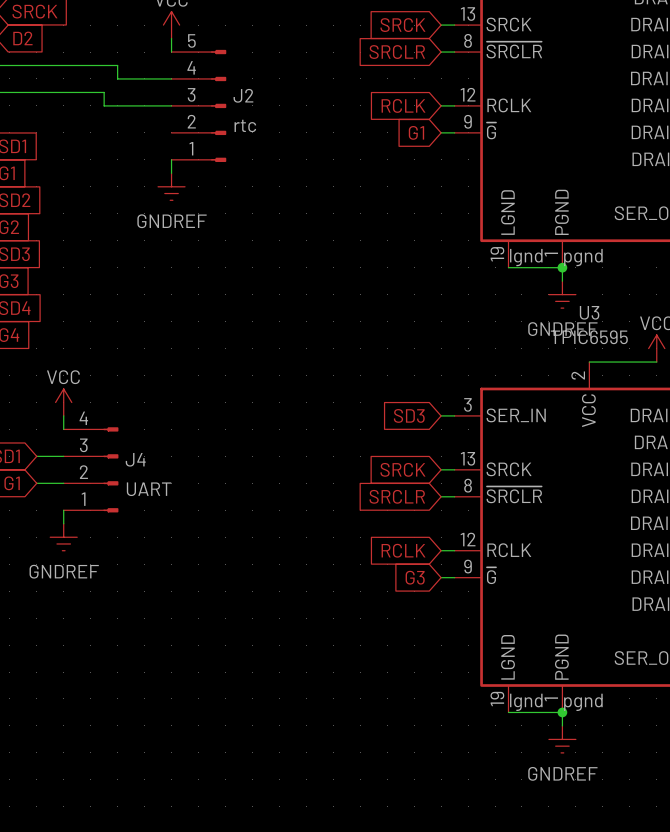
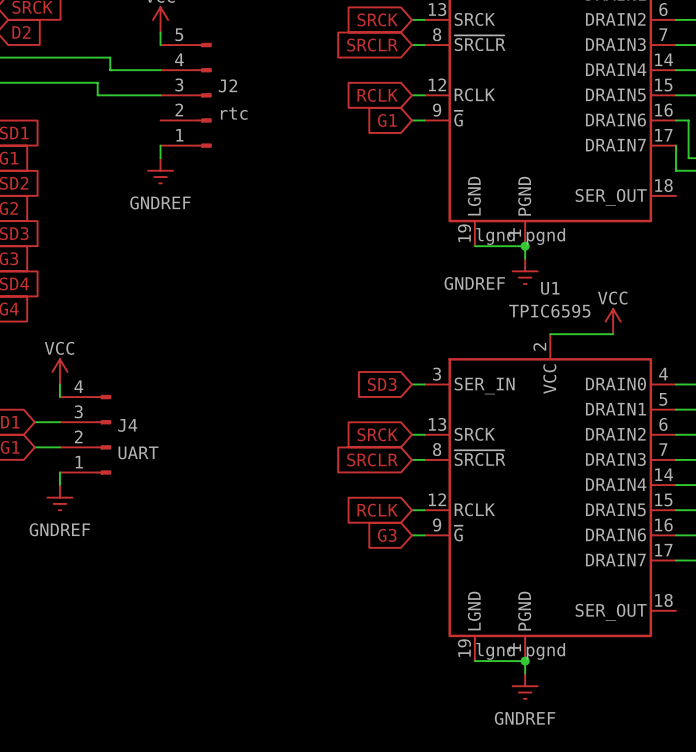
U3 name: U3 (589, 312) -> U1 (550, 288)
power symbol text position: GNDREF (562, 329) -> GNDREF (474, 283)

